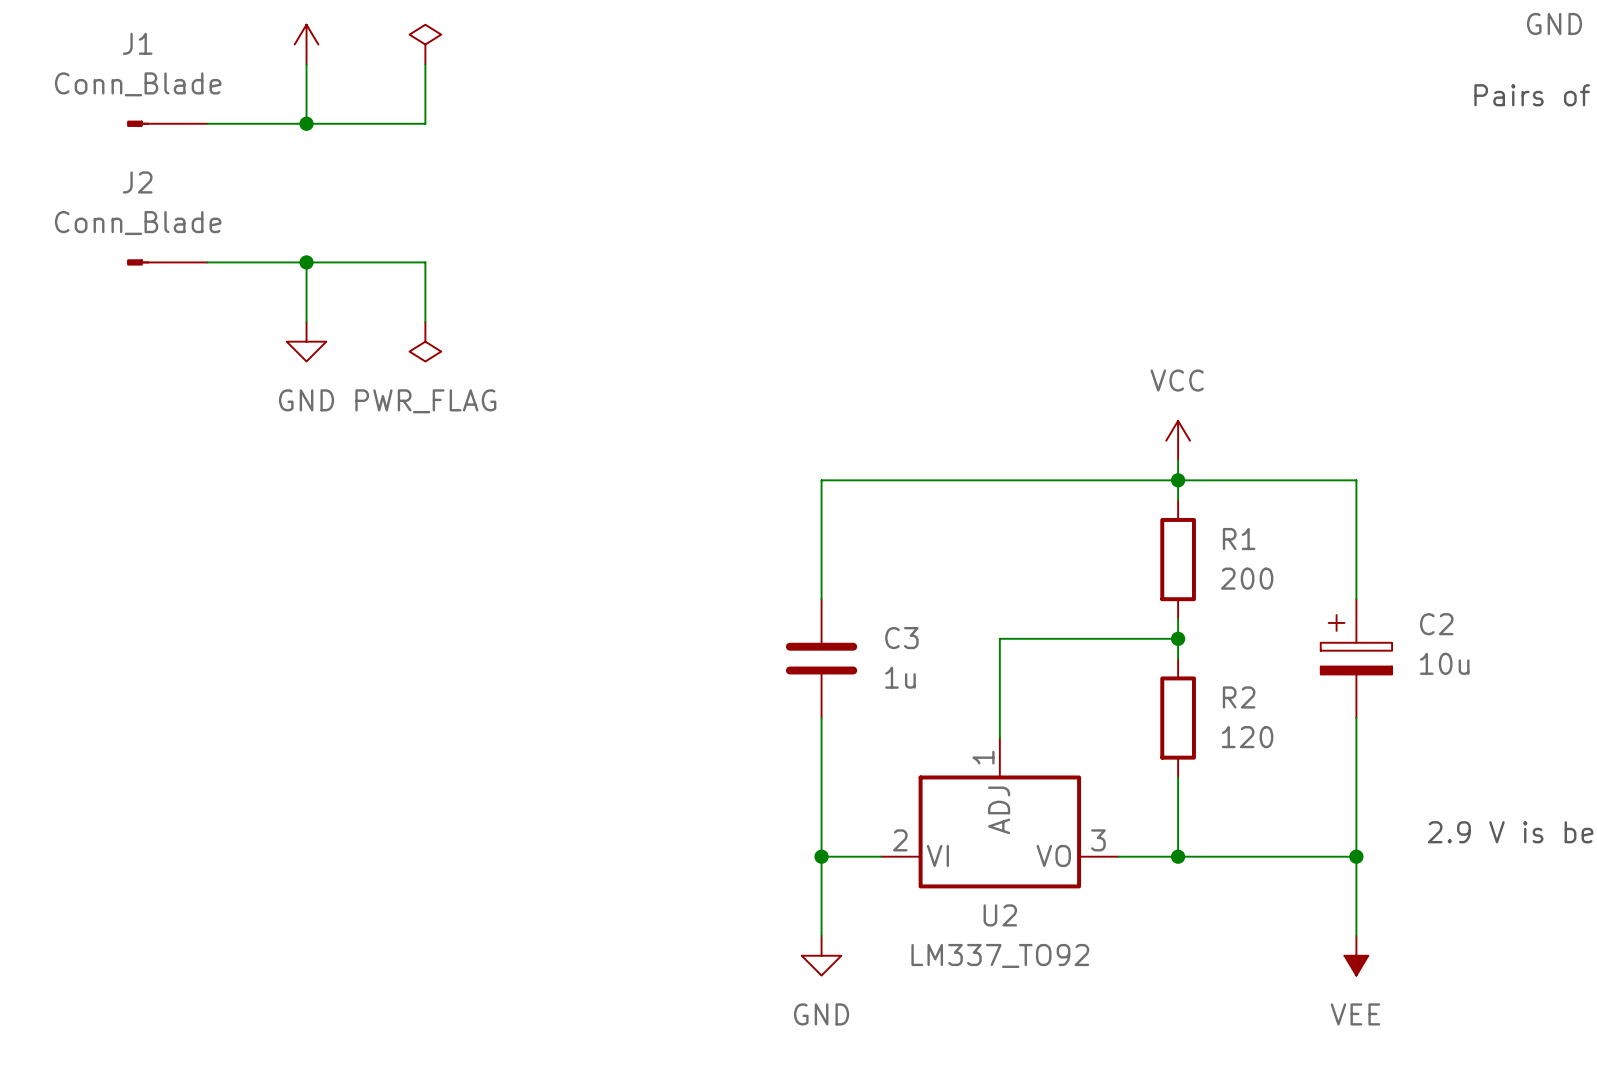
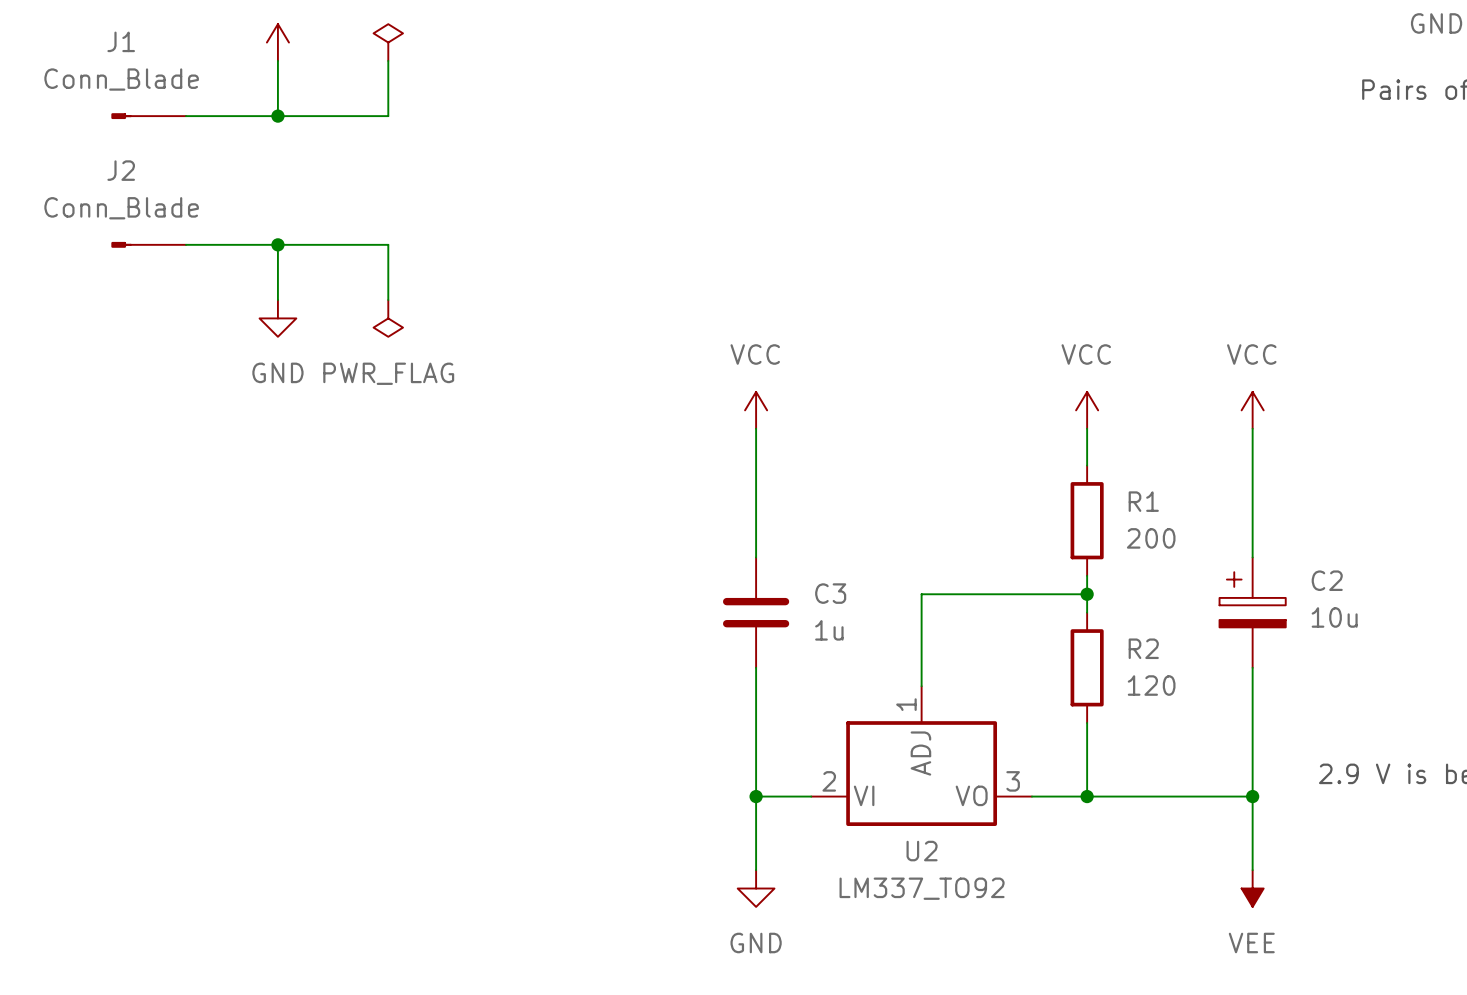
power symbol: none -> VCC (756, 410)
power symbol: none -> VCC (1252, 410)
wire: none -> (1252, 428) (1252, 447)
wire: (821, 480) (1356, 480) -> (756, 447) (756, 428)
junction: (1178, 480) -> none

